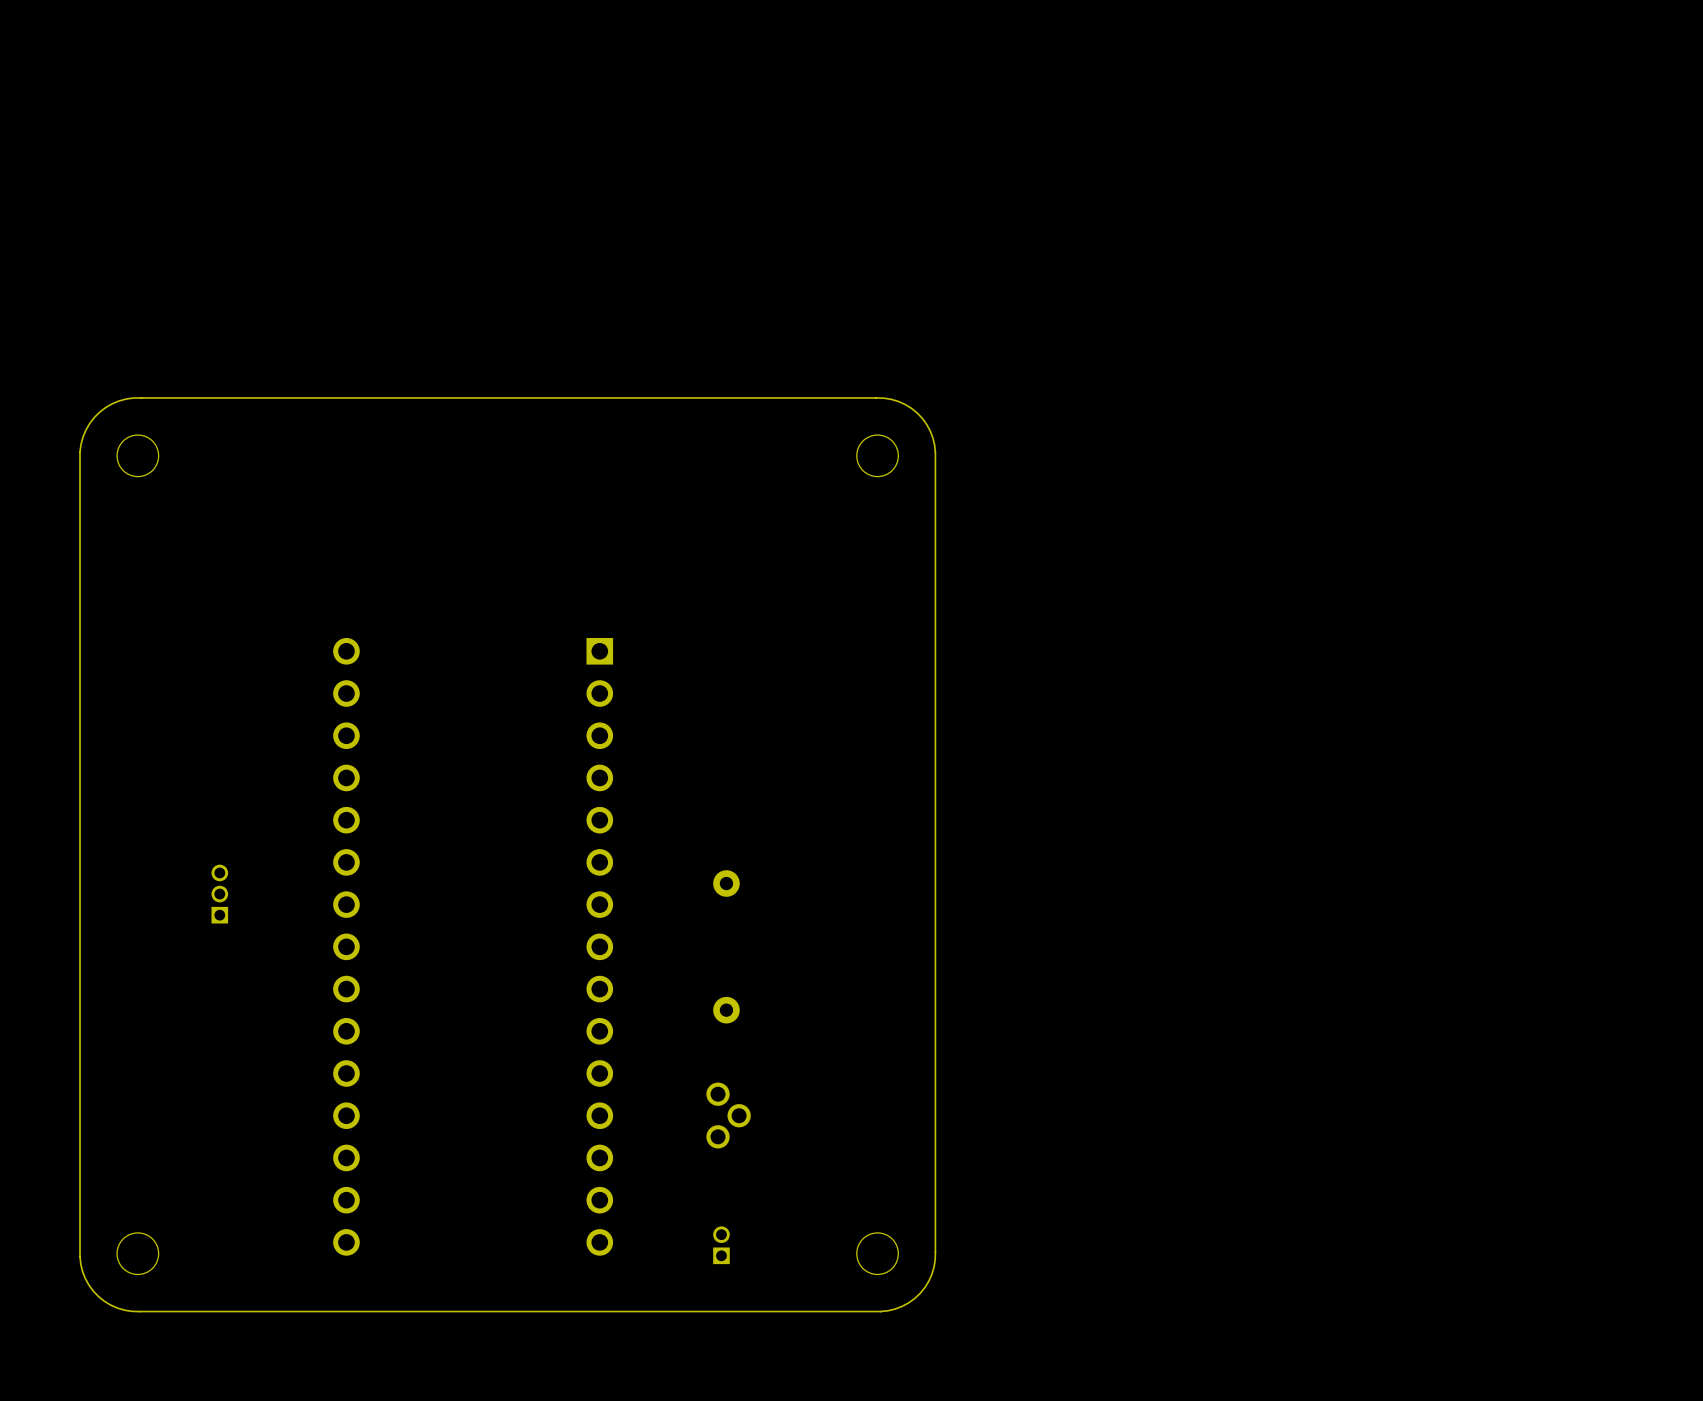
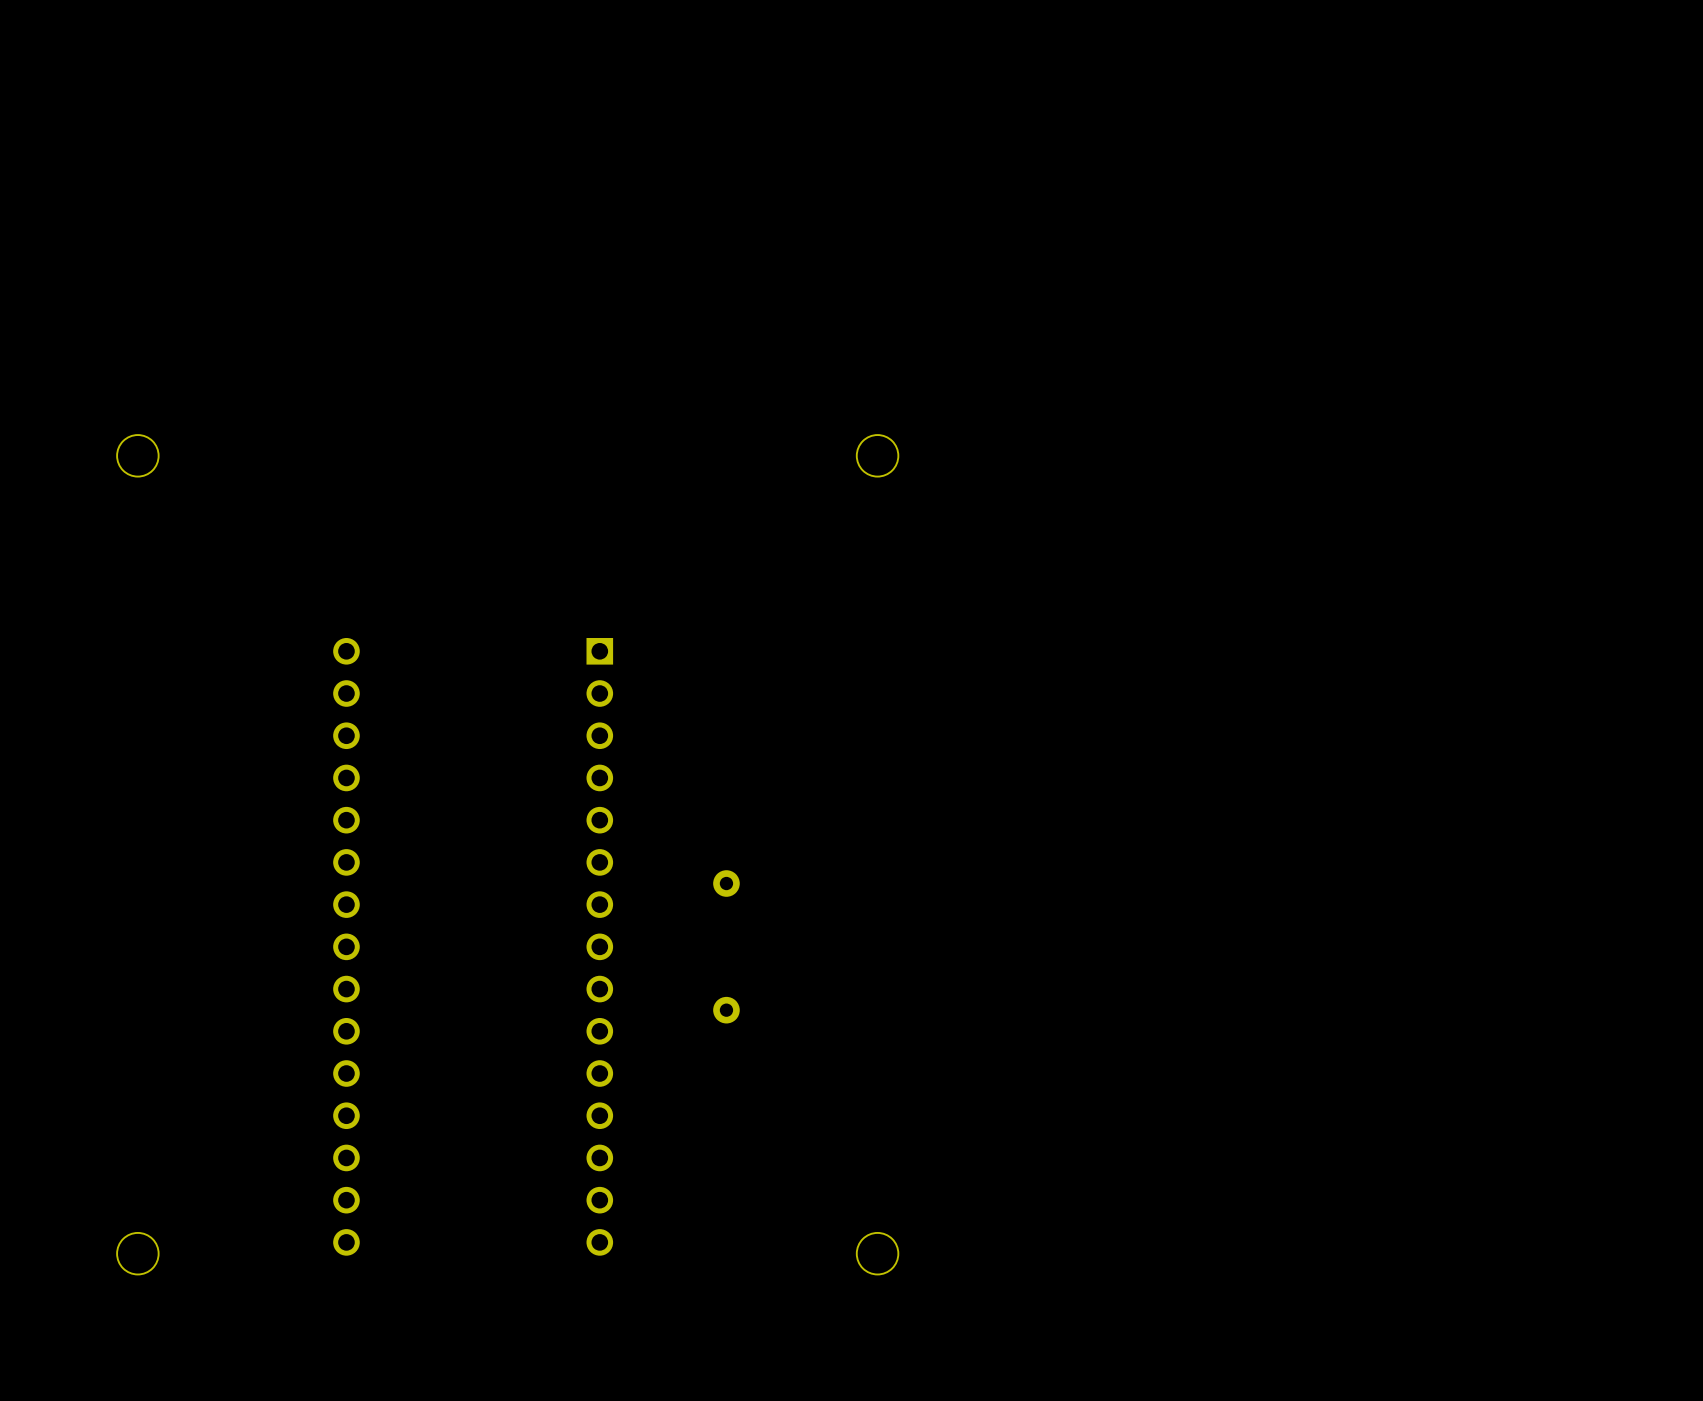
board edge: (876, 397) (133, 397) (112, 403) (94, 417) (85, 430) (80, 452) (80, 1256) (85, 1278) (98, 1296) (117, 1308) (139, 1311) (880, 1311) (902, 1306) (920, 1293) (931, 1274) (935, 1252) (935, 452) (930, 430) (917, 413) (898, 401) (876, 397) -> none
part: (219, 894) -> none
part: (728, 1115) -> none
part: (721, 1245) -> none

